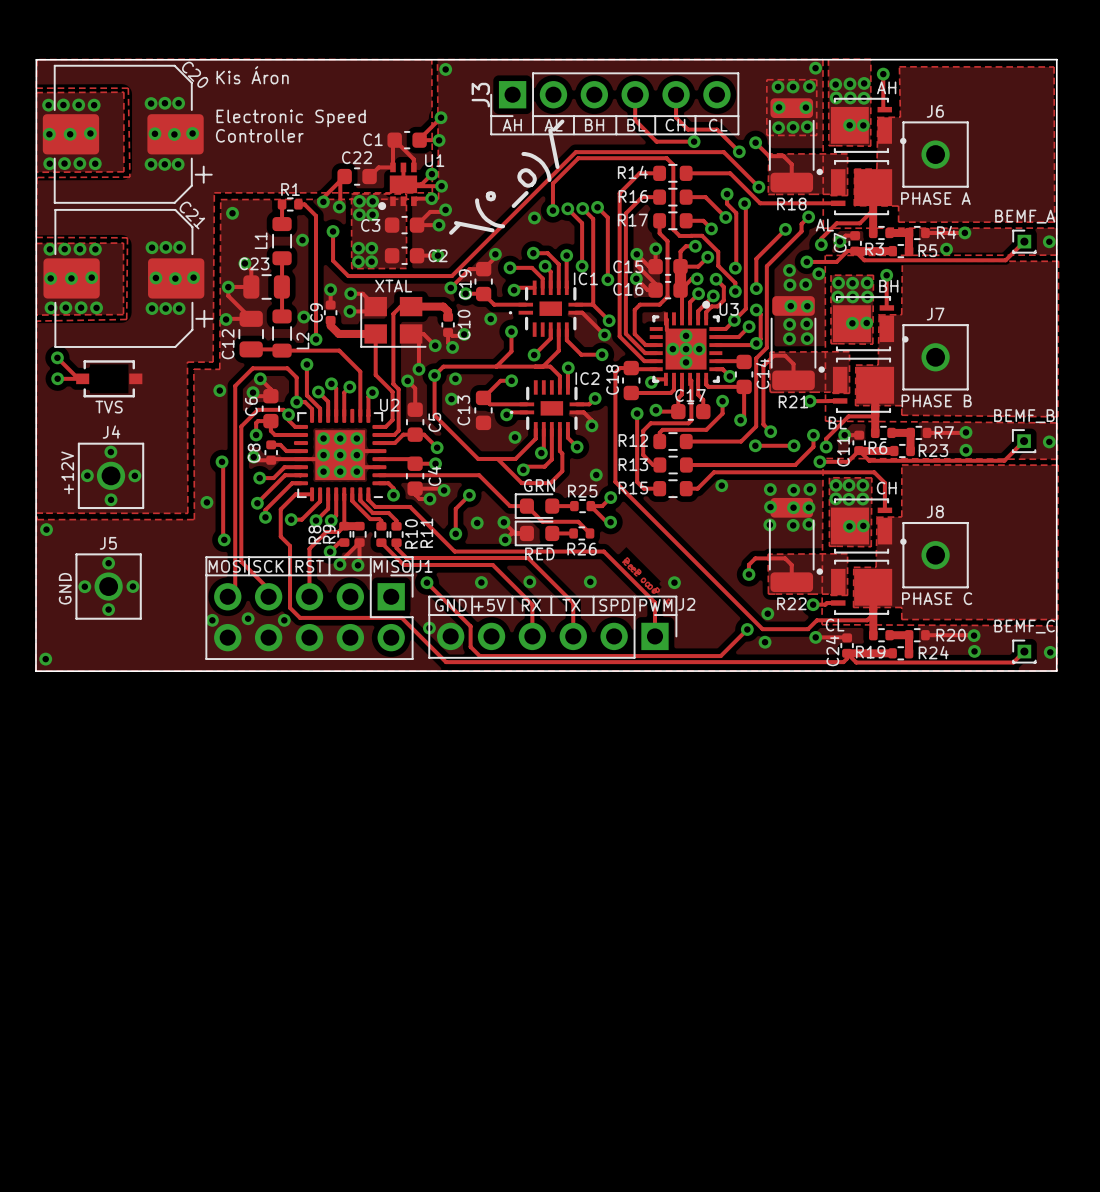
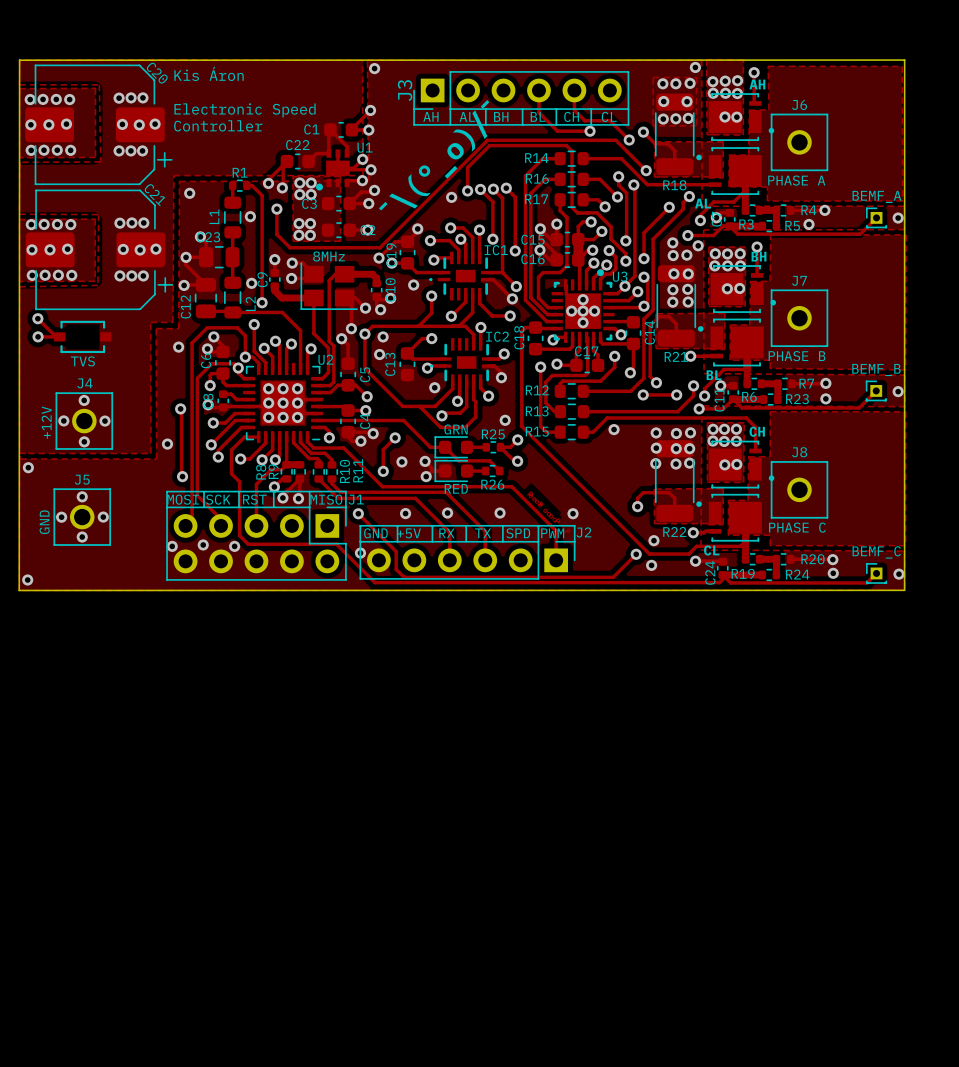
XTAL name: XTAL (393, 286) -> 8MHz (329, 256)

